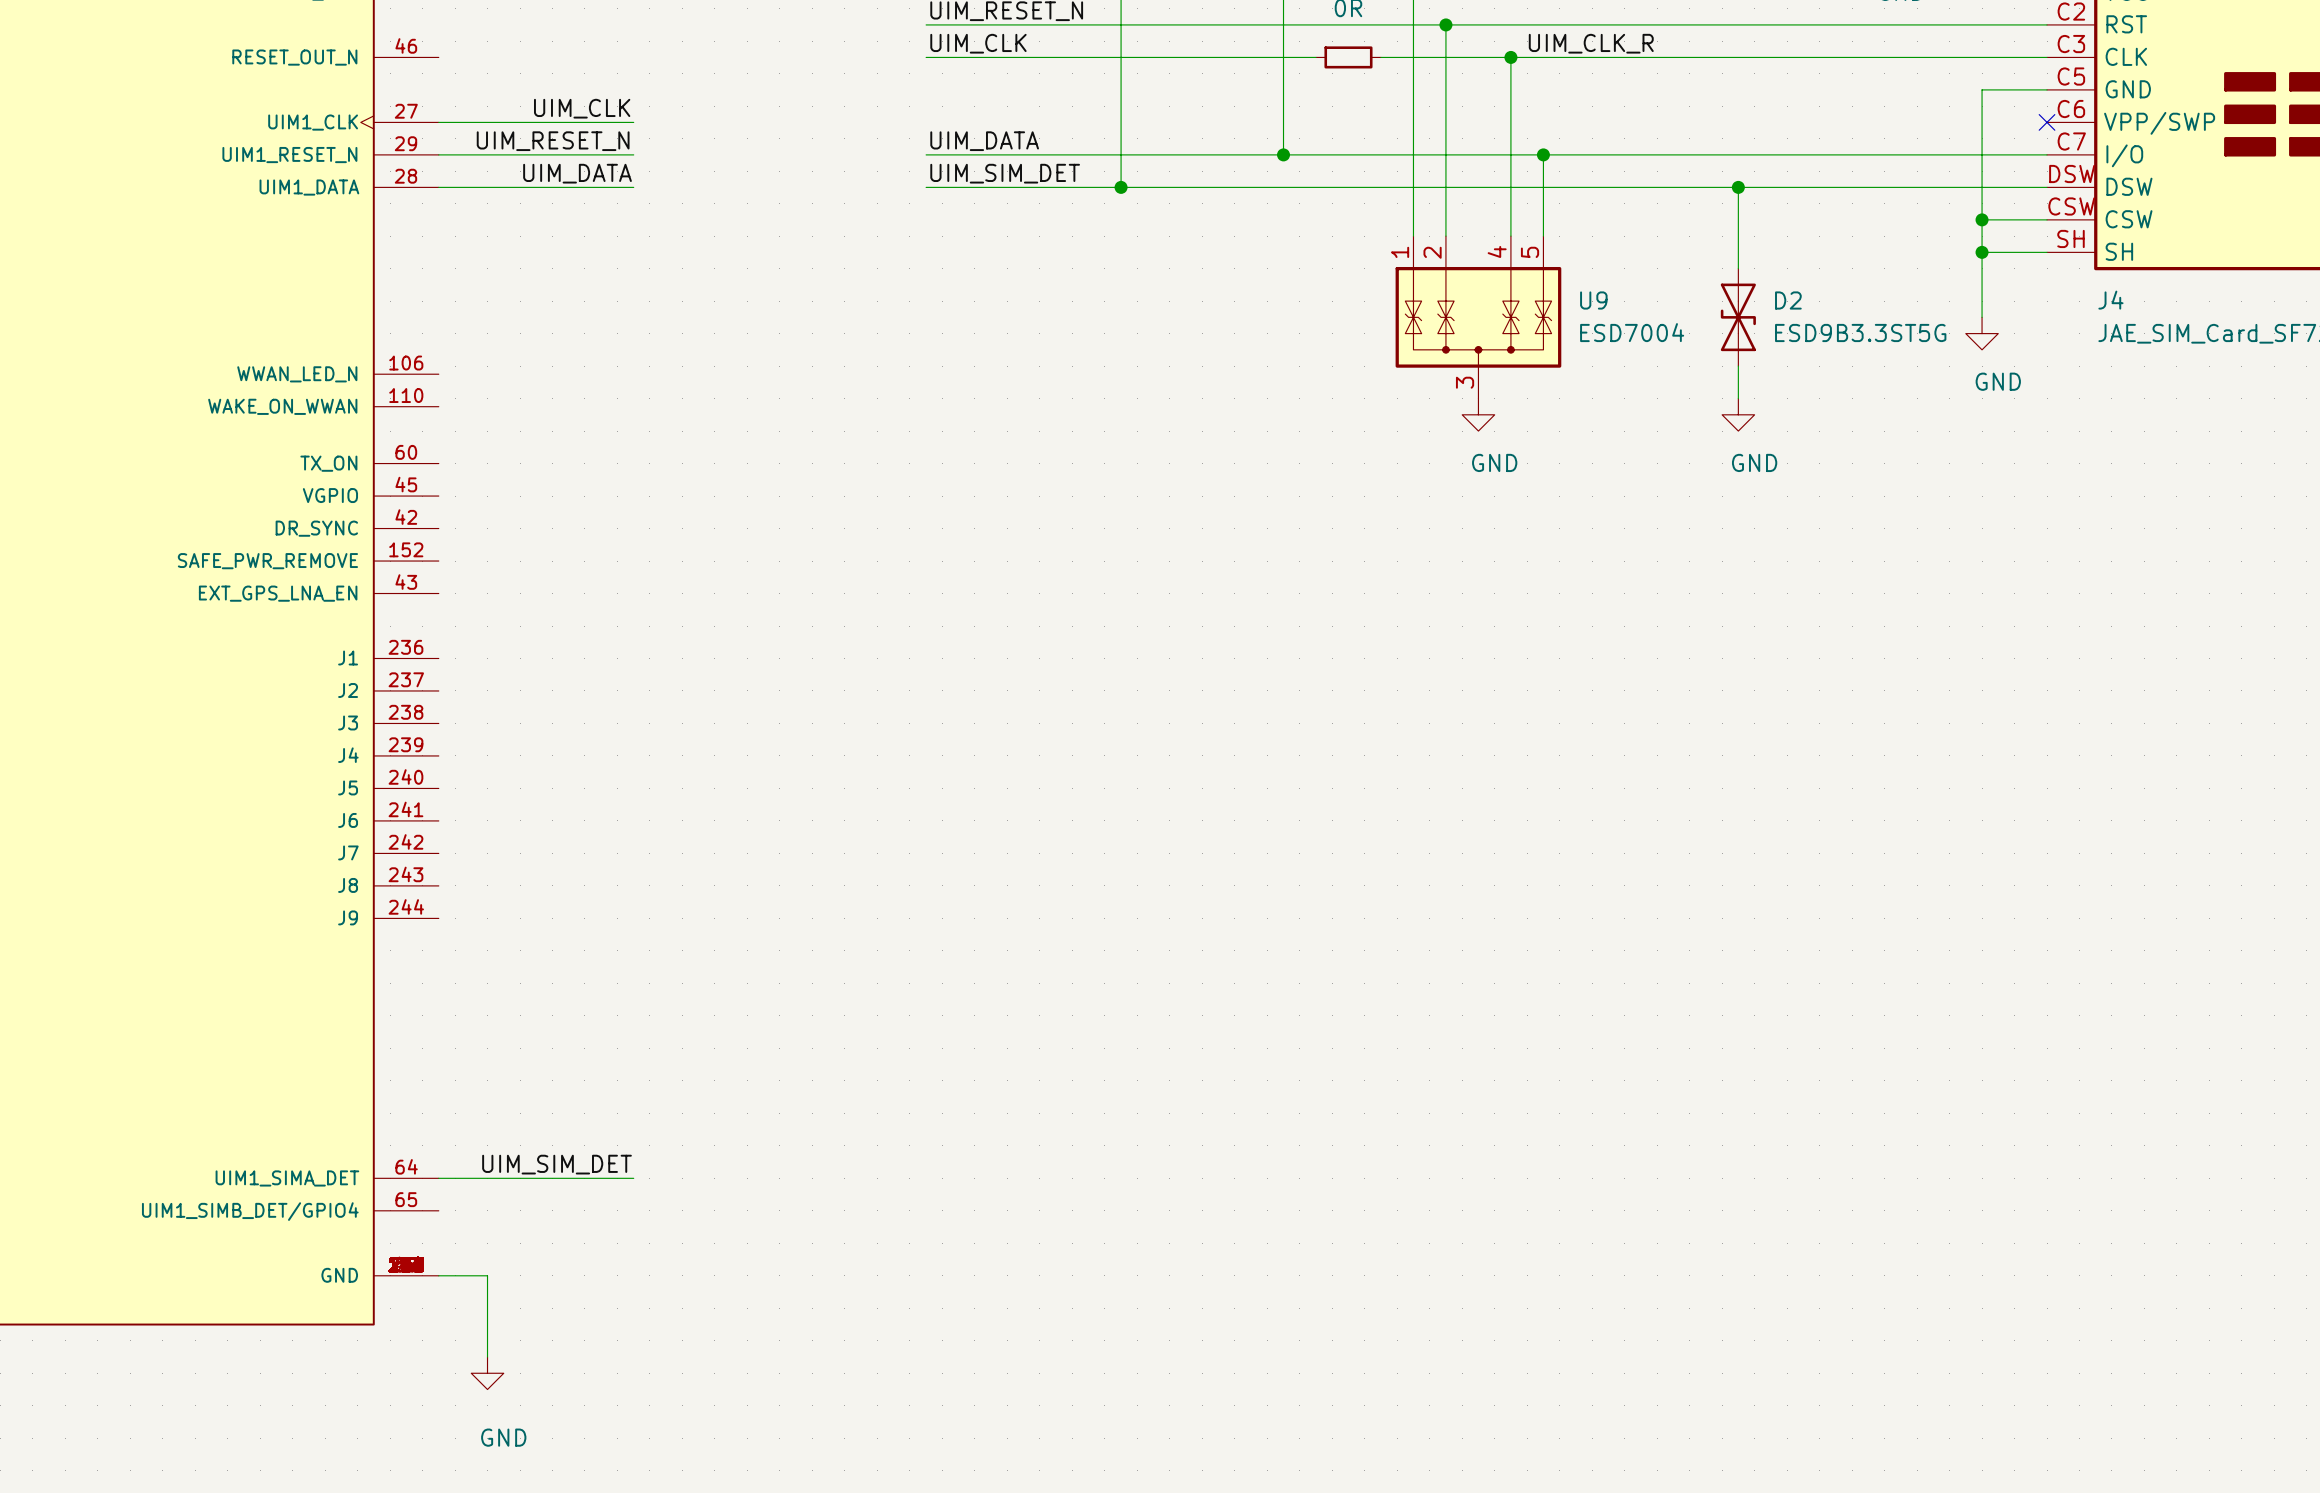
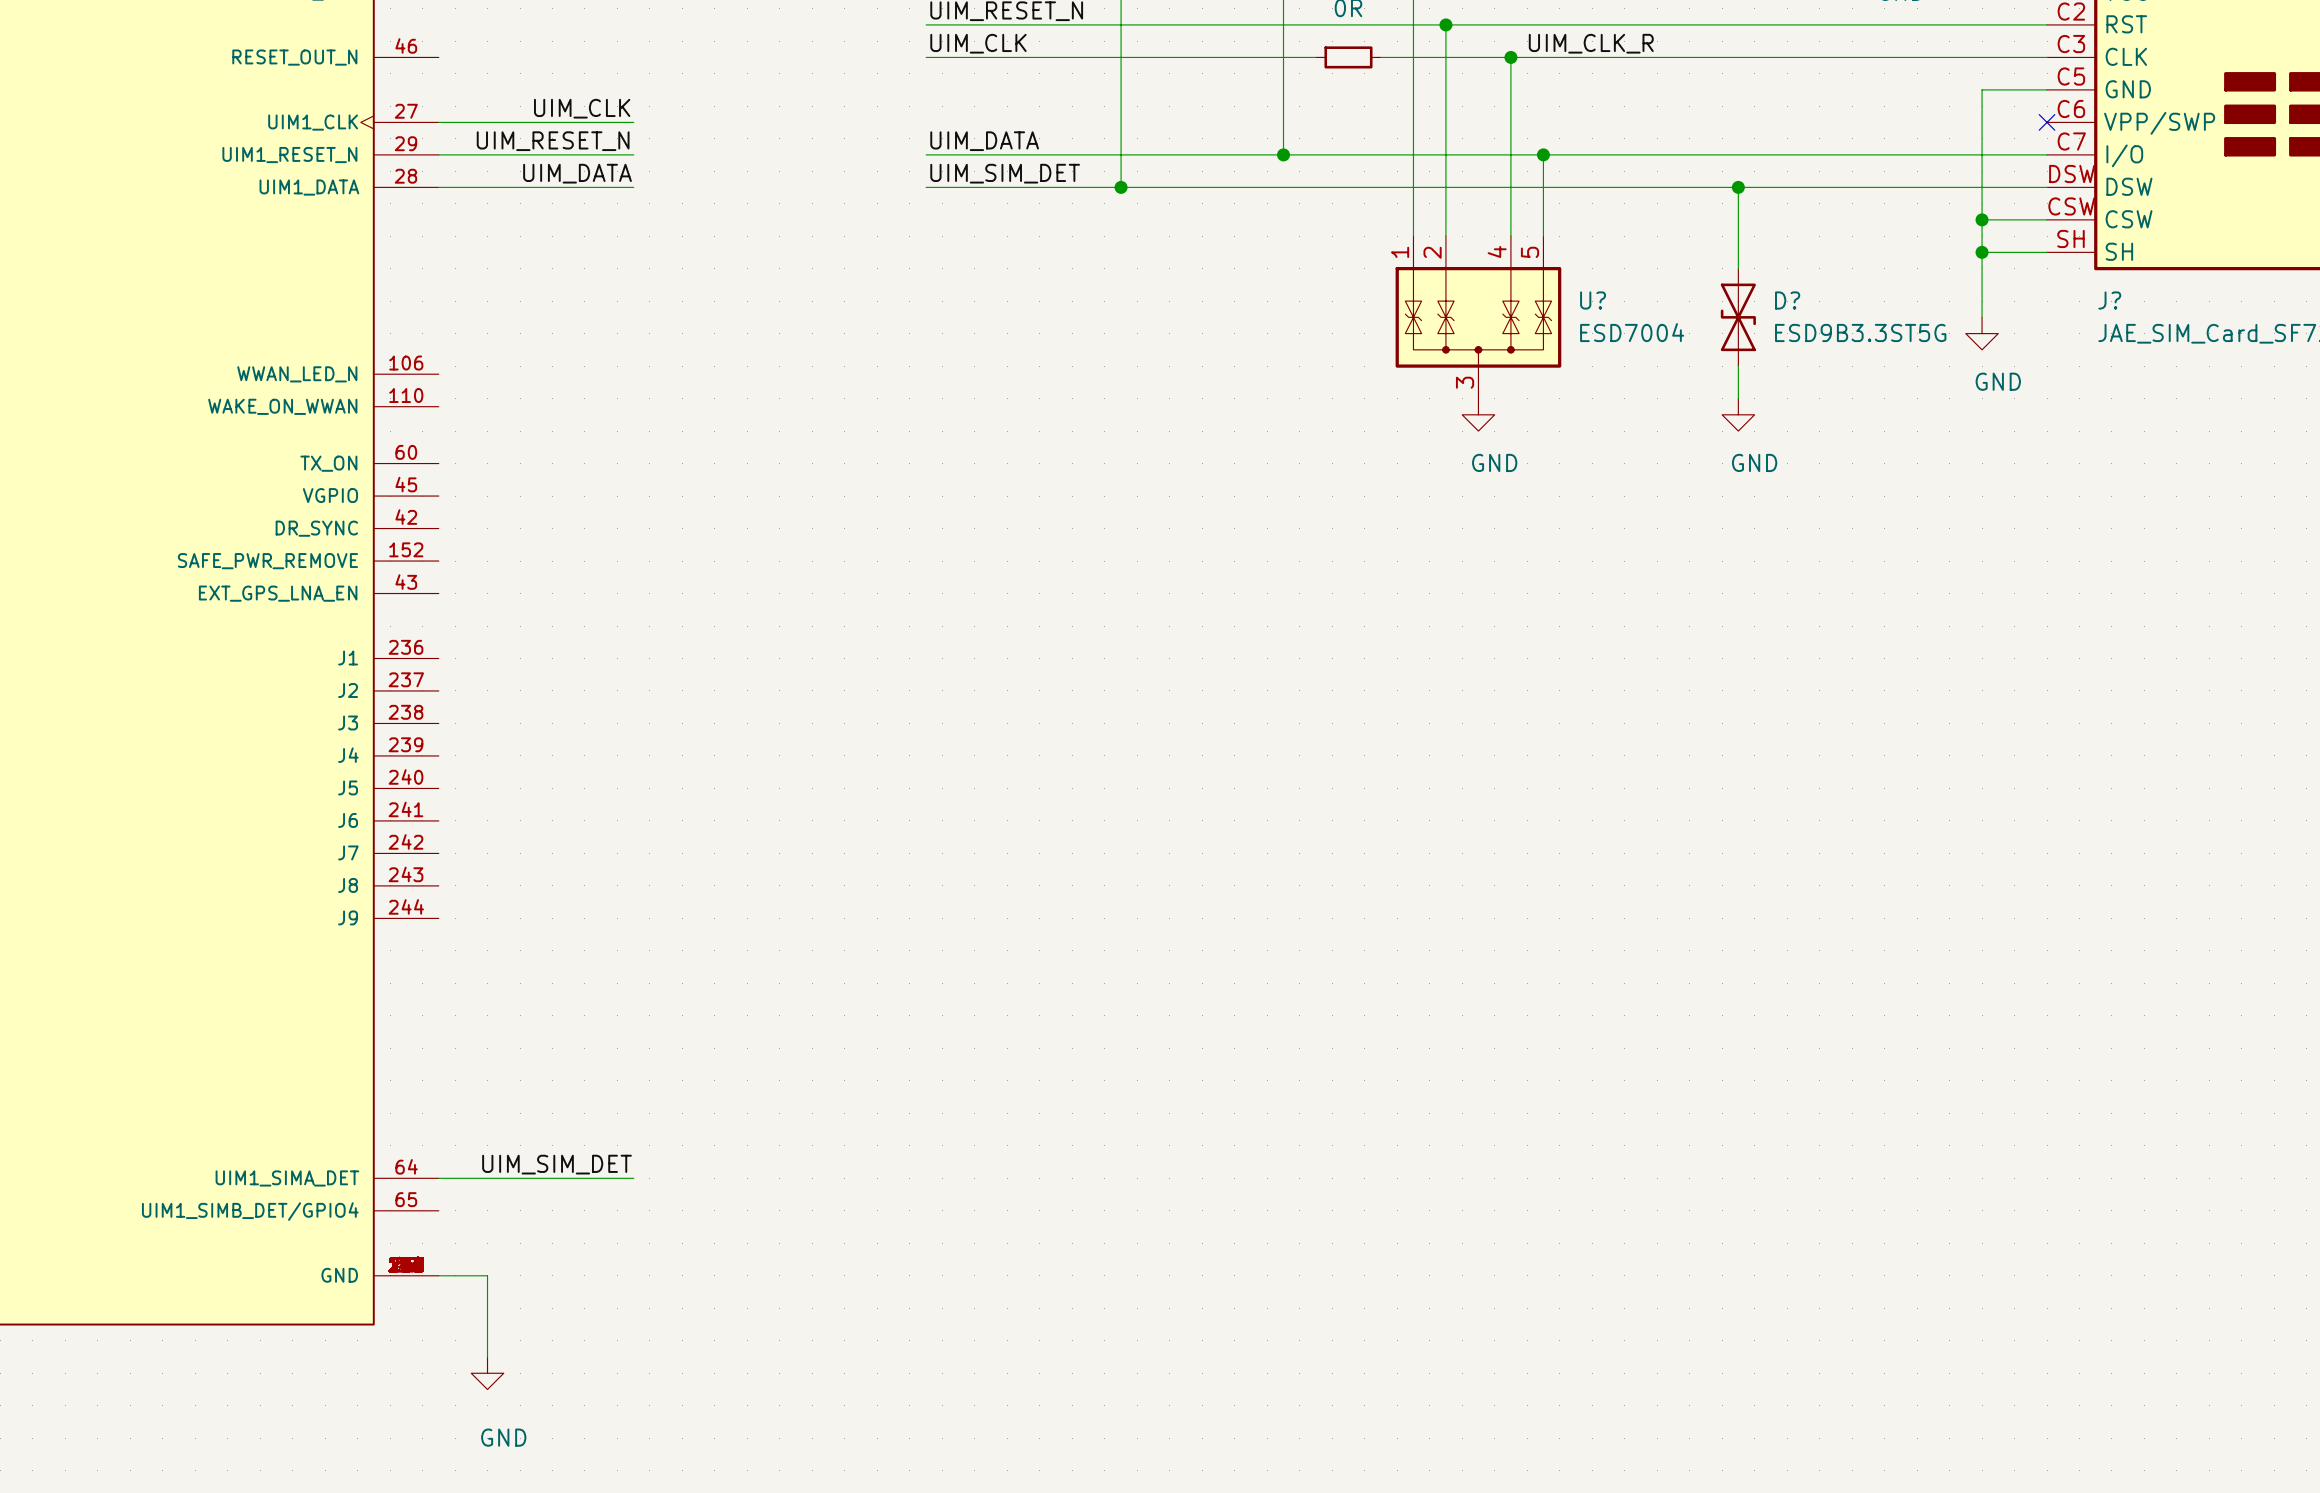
U9 name: U9 (1593, 300) -> U? (1593, 300)
D2 name: D2 (1788, 300) -> D? (1787, 300)
J4 name: J4 (2110, 300) -> J? (2109, 300)

